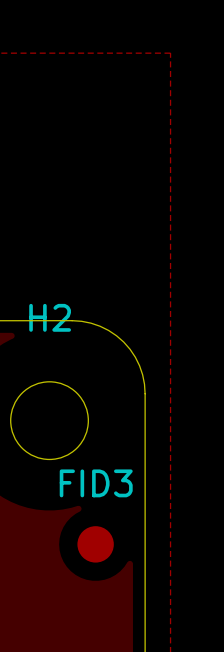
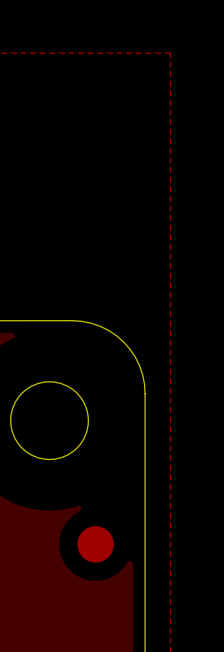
H2 name: H2 (50, 317) -> none
FID3 name: FID3 (96, 483) -> none

